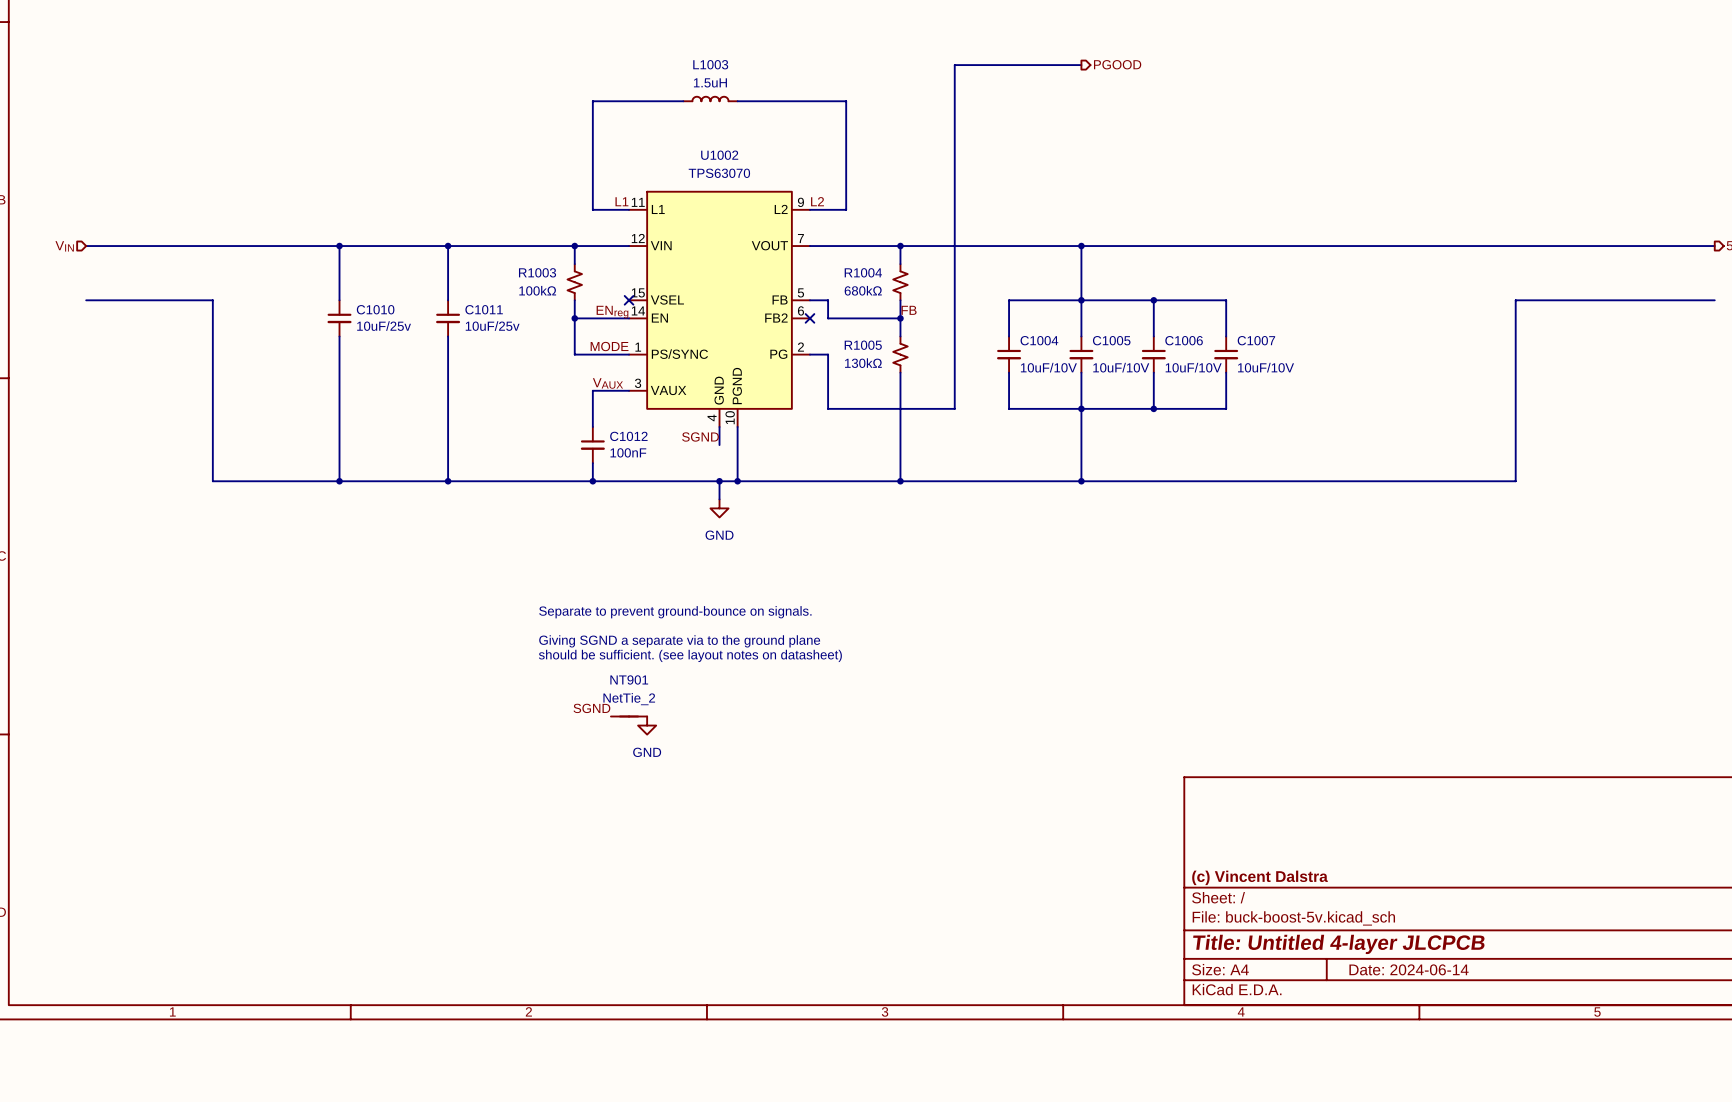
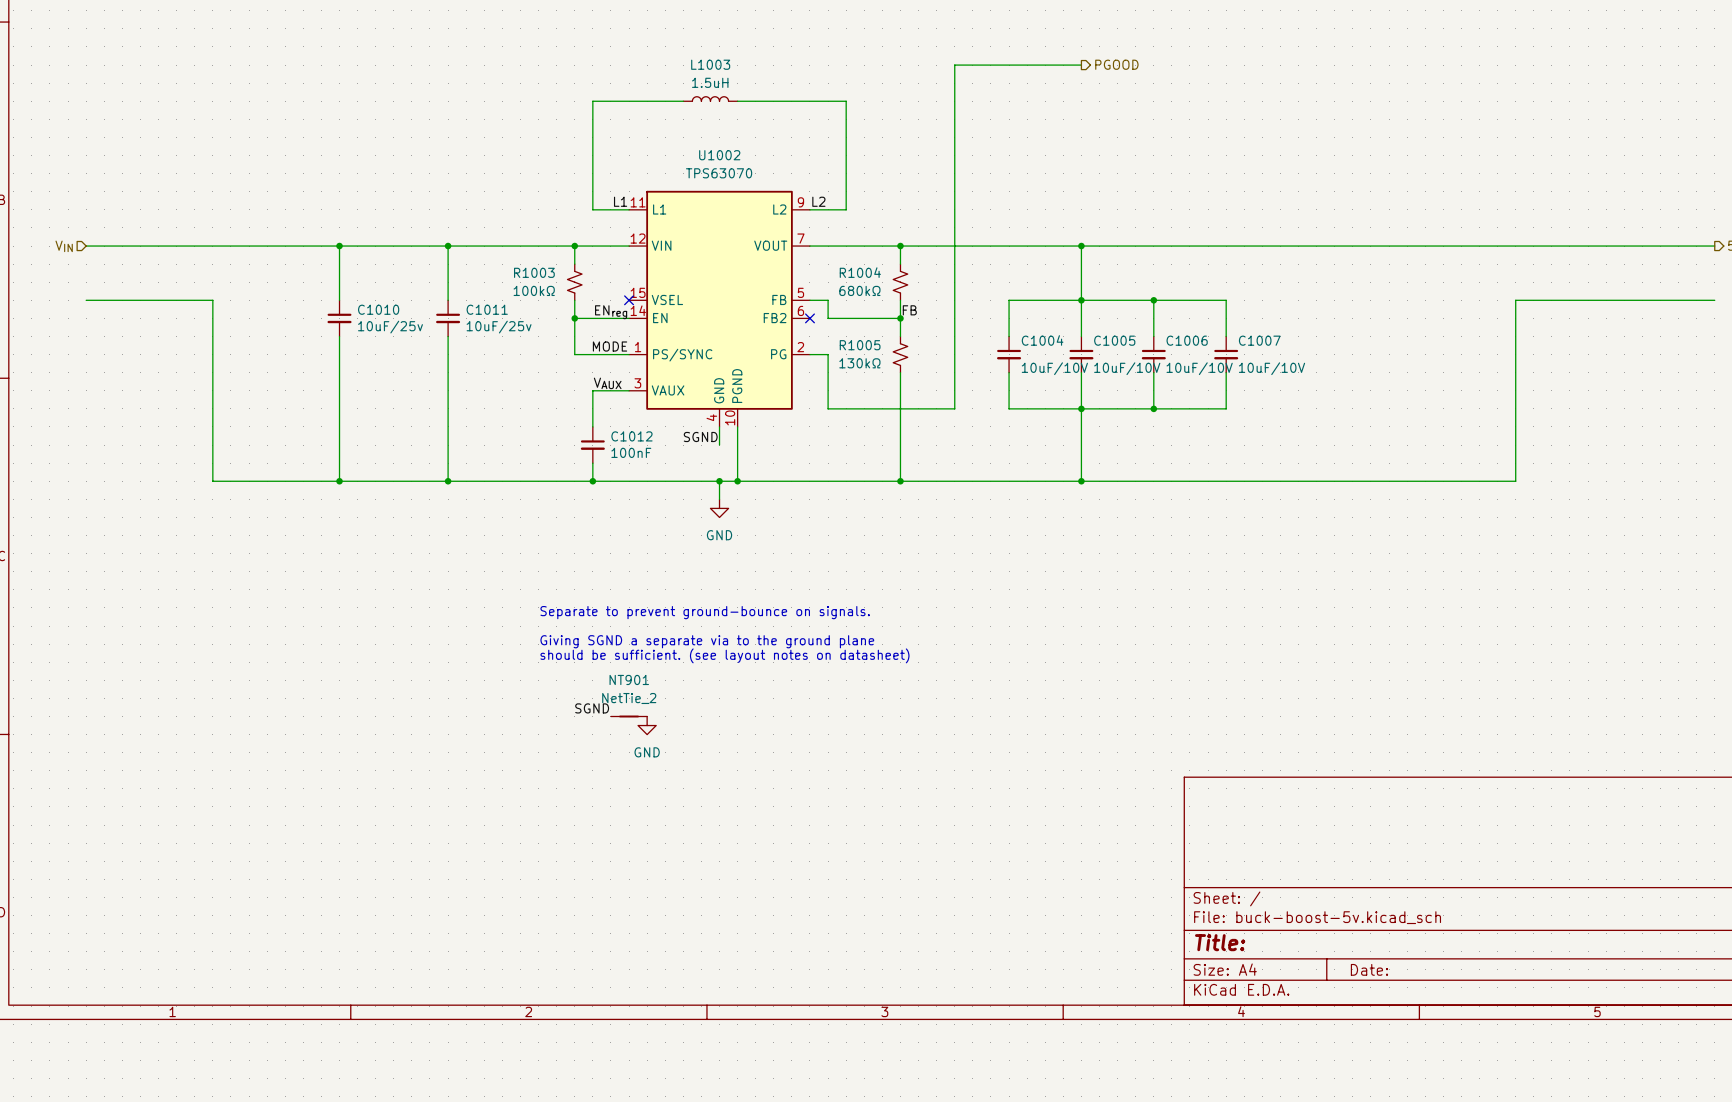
title block: (c) Vincent Dalstra (1260, 877) -> none
title block: Title: Untitled 4-layer JLCPCB (1338, 944) -> Title: (1220, 942)
title block: Date: 2024-06-14 (1409, 969) -> Date: (1369, 969)

